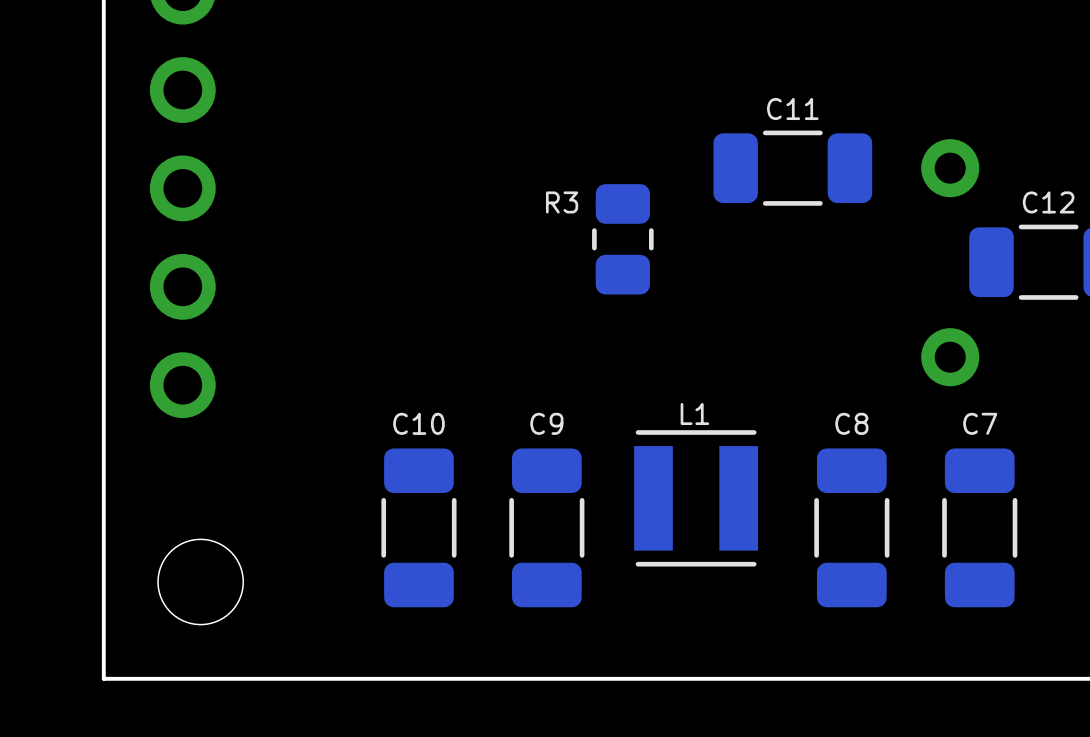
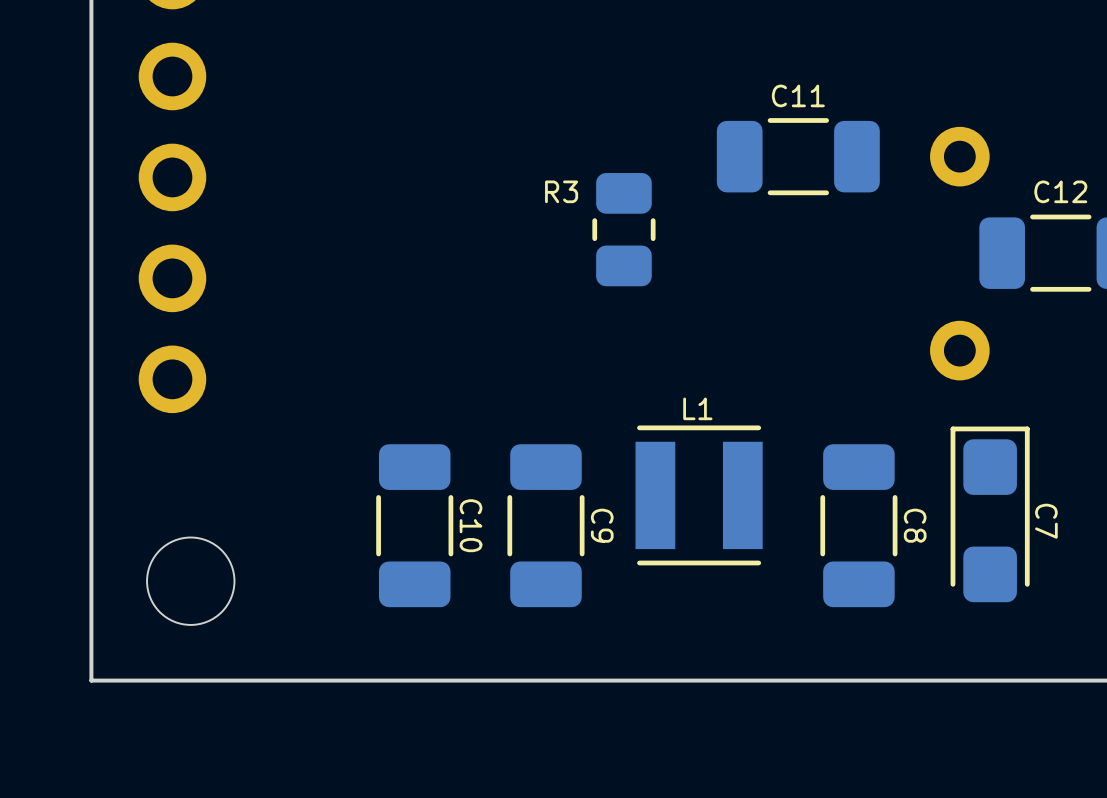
C10 name rotation: 0° (418, 423) -> 90° clockwise (471, 525)
C10 name position: C10 (418, 423) -> C10 (471, 525)
C9 name rotation: 0° (546, 423) -> 90° clockwise (602, 525)
C9 name position: C9 (546, 423) -> C9 (602, 525)
C8 name rotation: 0° (851, 423) -> 90° clockwise (915, 525)
C8 name position: C8 (851, 423) -> C8 (915, 525)
C7 name position: C7 (980, 423) -> C7 (1046, 521)
C7 footprint: [942, 448, 1018, 608] -> [950, 426, 1030, 603]

